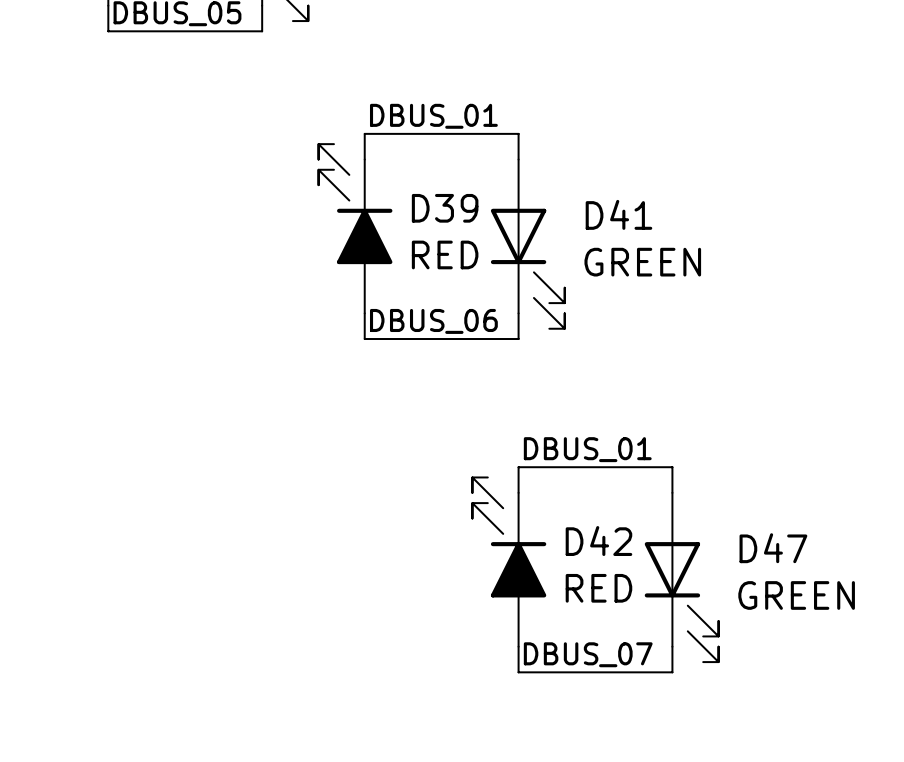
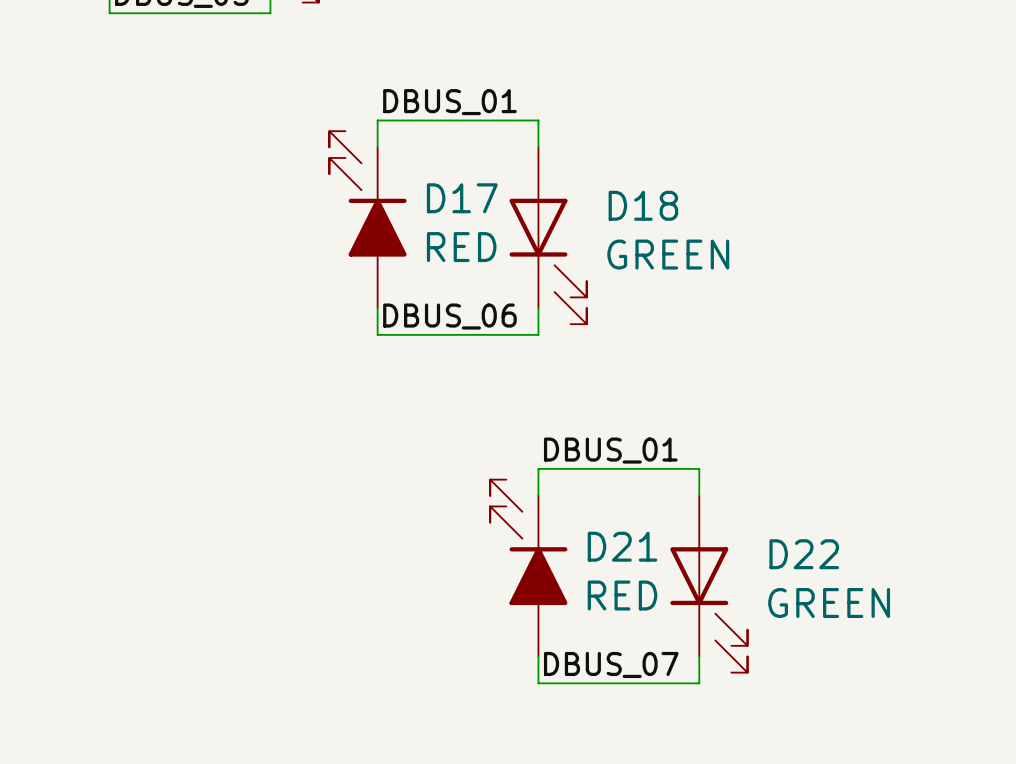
D39 name: D39 (445, 208) -> D17 (462, 198)
D41 name: D41 (618, 214) -> D18 (643, 205)
D42 name: D42 (598, 541) -> D21 (622, 546)
D47 name: D47 (773, 548) -> D22 (804, 554)

